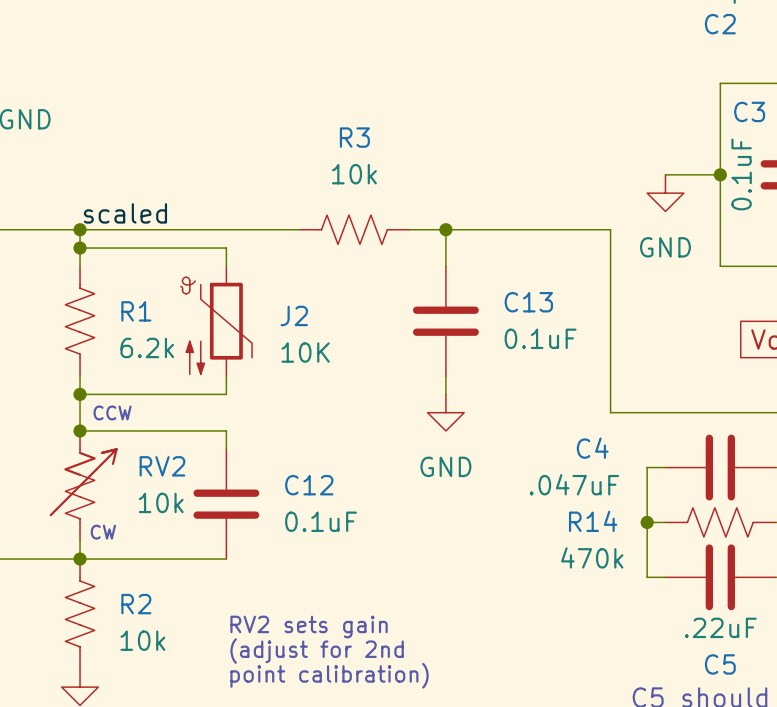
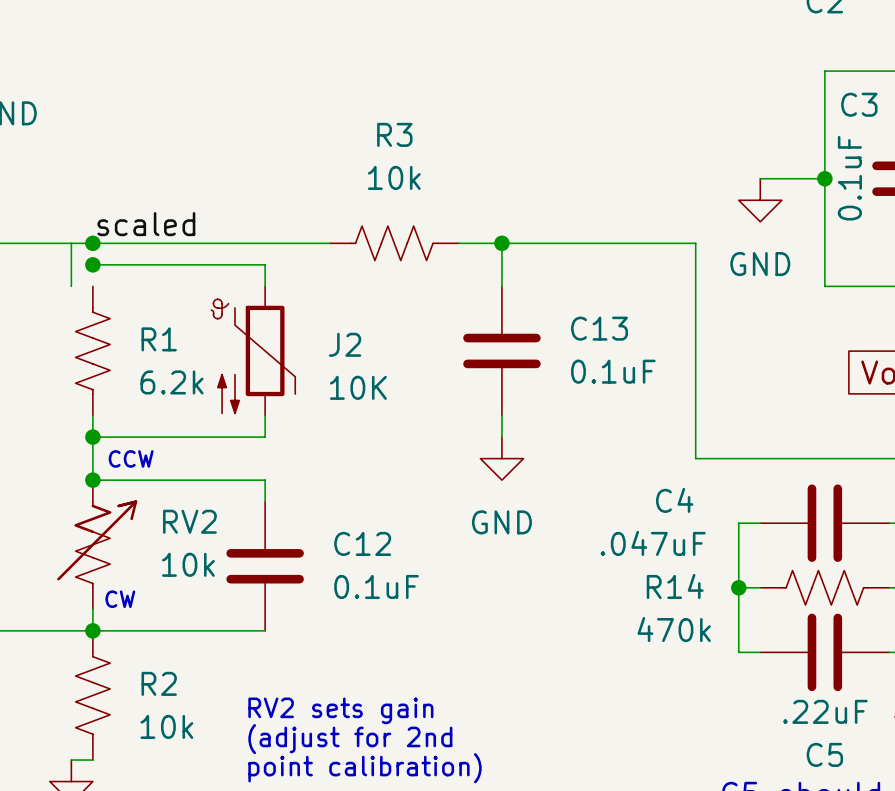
label position: scaled (125, 213) -> scaled (146, 224)
junction: (80, 229) -> none
junction: none -> (92, 243)
wire: (80, 248) (98, 248) -> none
junction: (80, 248) -> none
junction: none -> (92, 264)
wire: (226, 248) (226, 266) -> (243, 264) (265, 264) (265, 286)
R1 position: (80, 321) -> (92, 350)
J2 position: (216, 321) -> (253, 350)
wire: (80, 376) (80, 430) (98, 430) -> (92, 415) (92, 480)
wire: (226, 376) (226, 394) -> (265, 415) (265, 437) (243, 437)
wire: (80, 394) (98, 394) -> (243, 630) (265, 630)
junction position: (80, 394) -> (92, 437)
text position: CCW (112, 412) -> CCW (131, 458)
junction position: (80, 430) -> (92, 480)
wire: (226, 430) (226, 449) -> (243, 480) (265, 480) (265, 501)
RV2 position: (83, 485) -> (97, 544)
C12 position: (226, 504) -> (265, 566)
text position: CW (103, 532) -> CW (120, 599)
wire: (80, 540) (80, 559) -> (92, 609) (92, 630)
junction position: (80, 559) -> (92, 630)
R2 position: (80, 613) -> (92, 695)
wire: none -> (71, 760) (92, 760)

